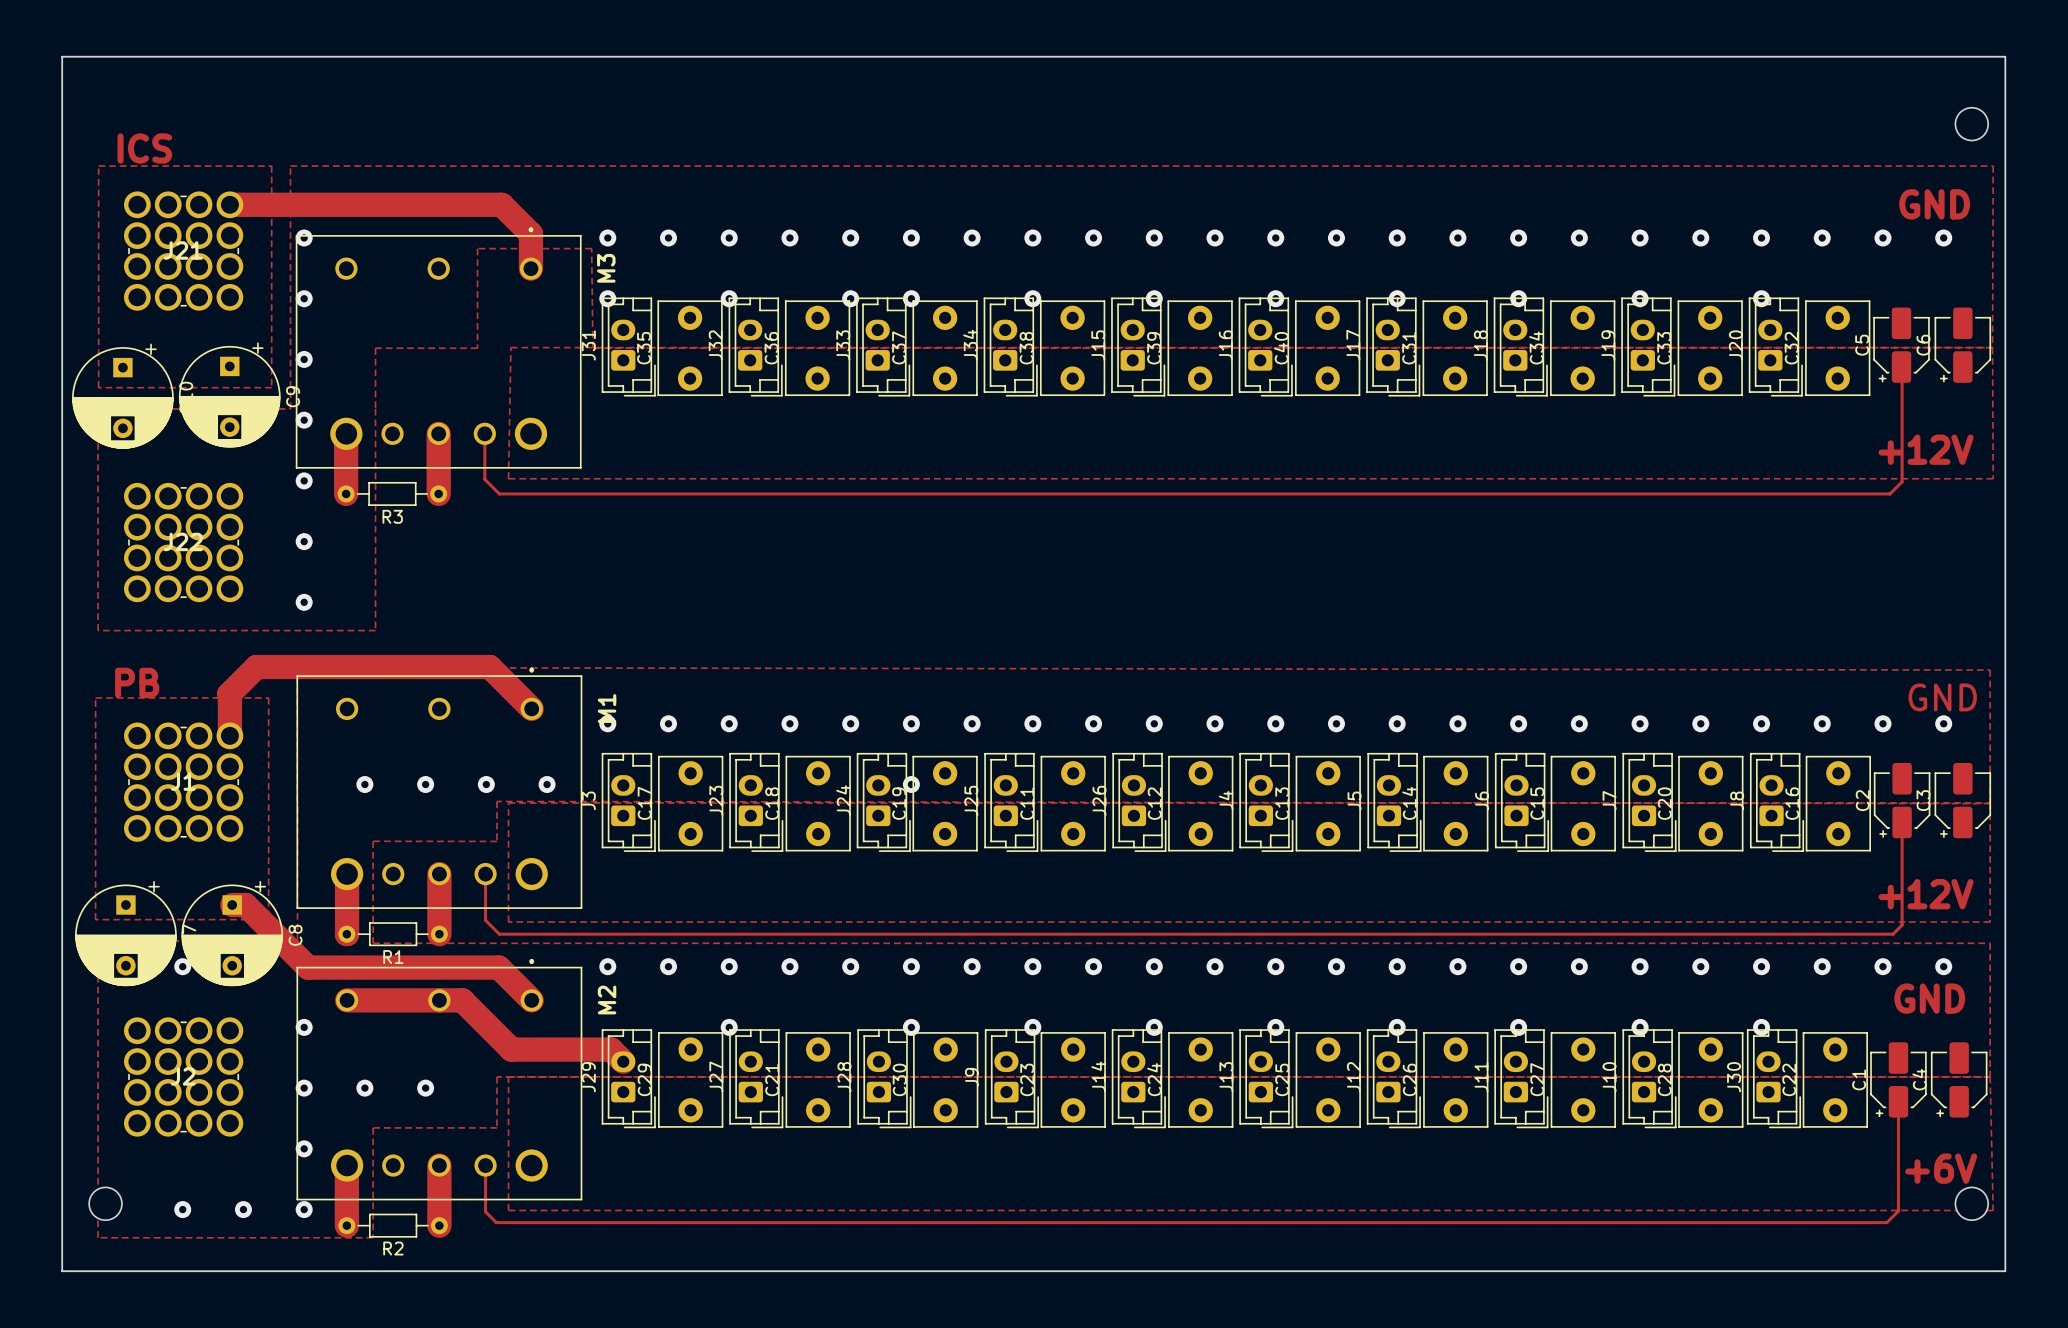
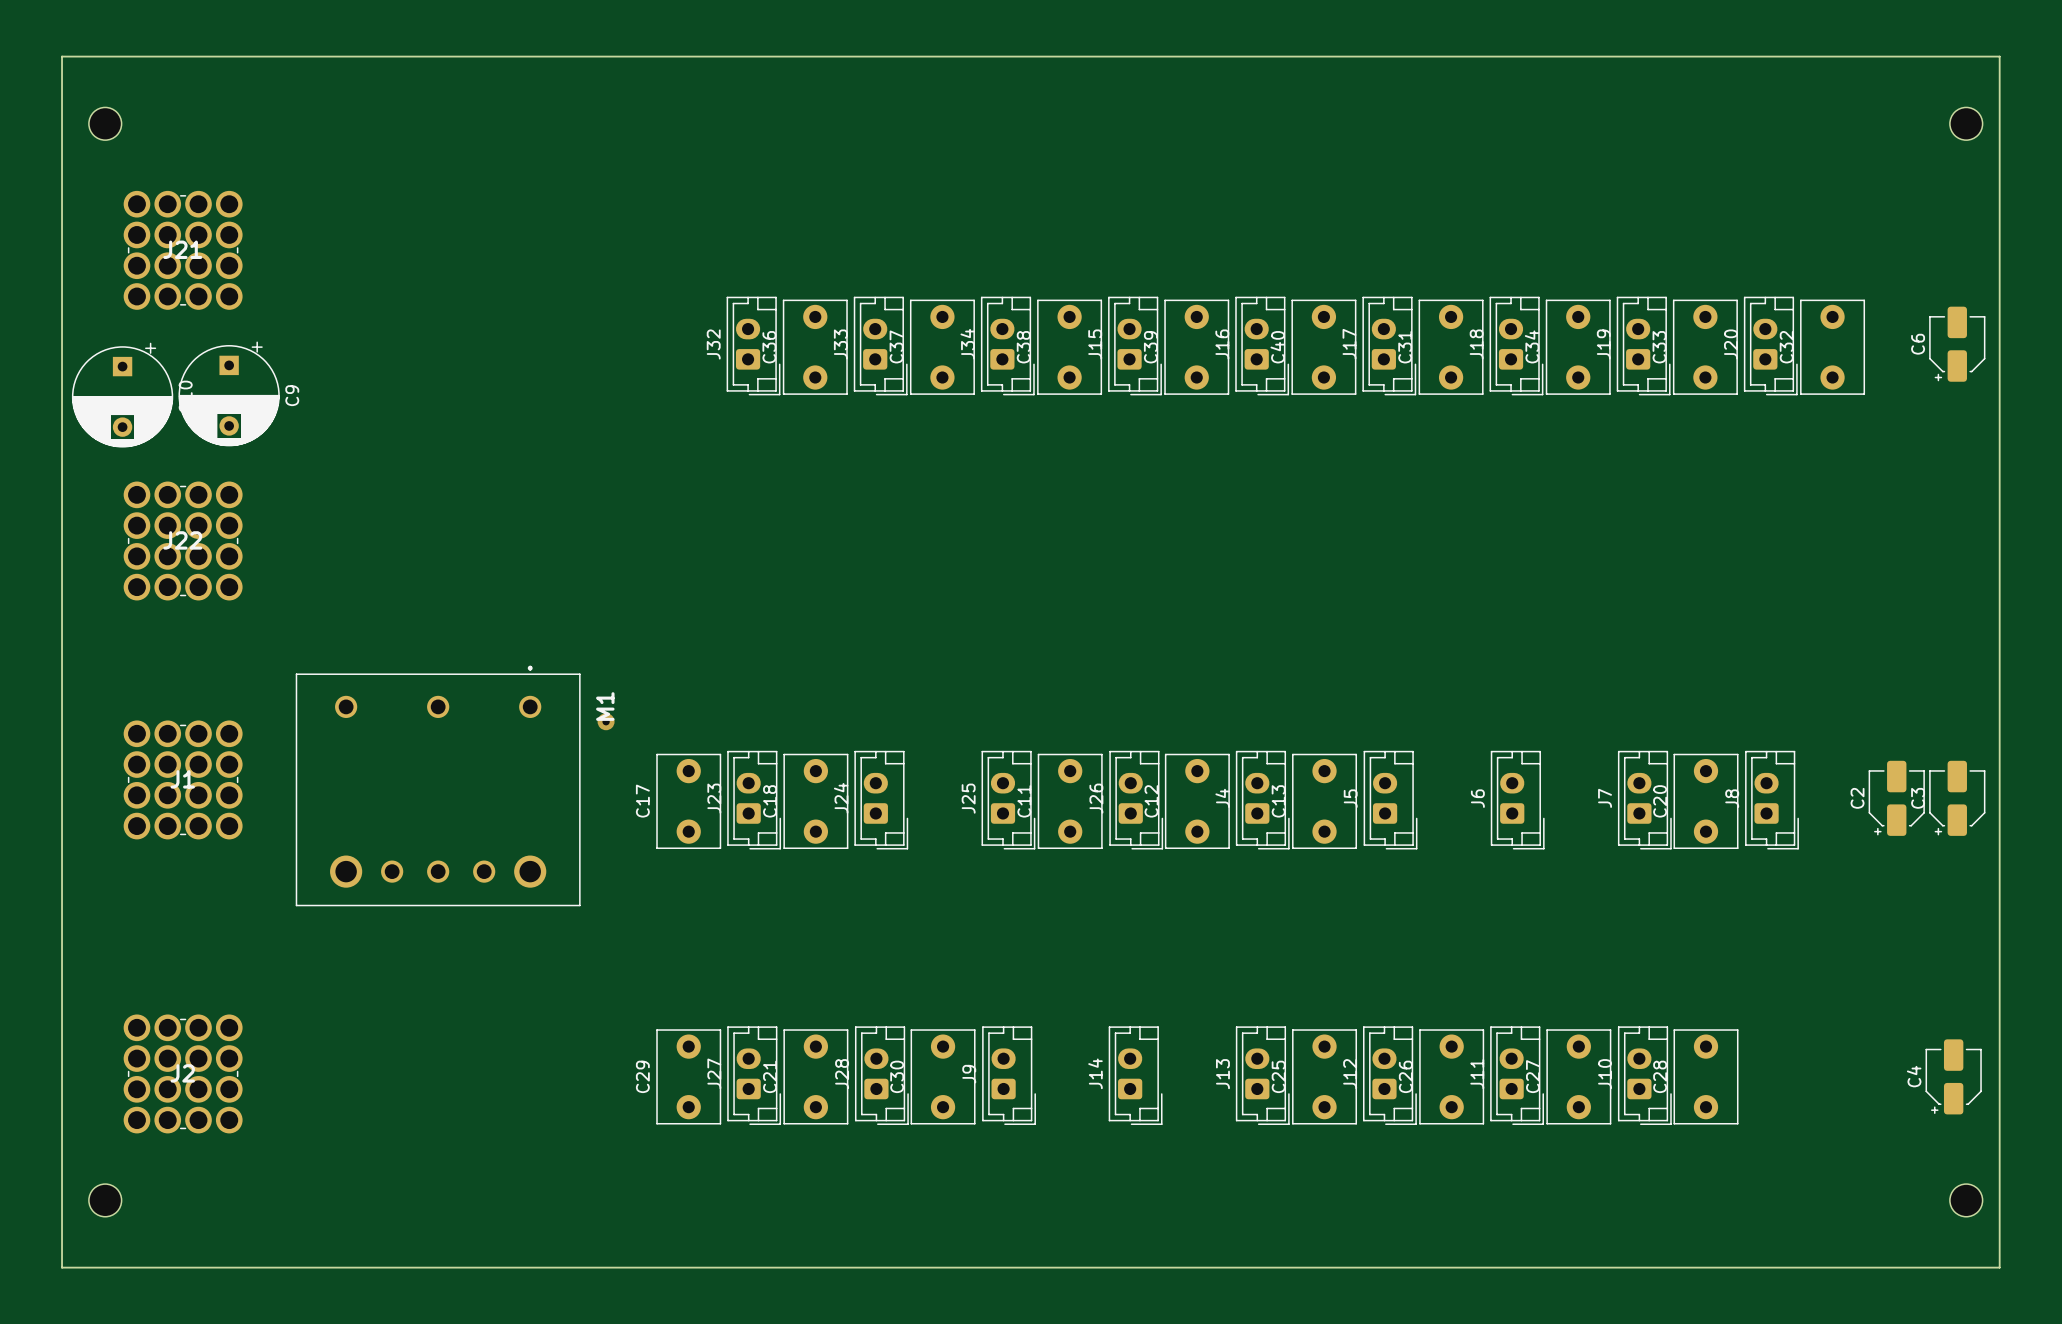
part: none -> (105, 123)
text: ICS (144, 148) -> none
zone outline: (98, 166) (271, 166) (271, 387) (98, 387) (98, 166) -> none
track: (229, 204) (501, 204) (530, 234) (530, 268) -> none
text: GND (1934, 204) -> none
via: (304, 238) -> none
via: (607, 238) -> none
via: (668, 238) -> none
via: (729, 238) -> none
via: (789, 238) -> none
via: (850, 238) -> none
via: (911, 238) -> none
via: (972, 238) -> none
via: (1032, 238) -> none
via: (1093, 238) -> none
via: (1154, 238) -> none
via: (1215, 238) -> none
via: (1275, 238) -> none
via: (1336, 238) -> none
via: (1397, 238) -> none
via: (1457, 238) -> none
via: (1518, 238) -> none
via: (1579, 238) -> none
via: (1640, 238) -> none
via: (1700, 238) -> none
via: (1761, 238) -> none
via: (1822, 238) -> none
via: (1882, 238) -> none
via: (1943, 238) -> none
via: (304, 298) -> none
via: (607, 298) -> none
via: (729, 298) -> none
via: (850, 298) -> none
via: (911, 298) -> none
via: (1032, 298) -> none
via: (1154, 298) -> none
via: (1275, 298) -> none
via: (1397, 298) -> none
via: (1518, 298) -> none
via: (1640, 298) -> none
via: (1761, 298) -> none
C5: (1901, 345) -> none
M3: (438, 347) -> none
J31: (628, 347) -> none
zone outline: (1992, 347) (592, 348) (591, 248) (477, 248) (477, 348) (375, 348) (375, 630) (98, 630) (98, 408) (290, 408) (290, 166) (1993, 166) (1992, 347) -> none
zone outline: (1992, 347) (510, 347) (508, 478) (1993, 478) (1992, 347) -> none
C35: (690, 348) -> none
via: (304, 359) -> none
track: (1901, 367) (1902, 481) (1889, 493) (499, 493) (484, 479) (484, 433) -> none
via: (304, 420) -> none
track: (346, 433) (346, 493) -> none
track: (438, 433) (438, 493) -> none
text: +12V (1926, 449) -> none
via: (304, 480) -> none
R3: (392, 493) -> none
via: (304, 541) -> none
via: (304, 602) -> none
text: PB (137, 682) -> none
zone outline: (95, 697) (95, 919) (268, 919) (268, 697) (95, 697) -> none
text: GND (1942, 697) -> none
track: (531, 708) (489, 667) (256, 667) (229, 694) (229, 735) -> none
via: (668, 723) -> none
via: (729, 723) -> none
via: (789, 723) -> none
via: (850, 723) -> none
via: (911, 723) -> none
via: (972, 723) -> none
via: (1032, 723) -> none
via: (1093, 723) -> none
via: (1154, 723) -> none
via: (1215, 723) -> none
via: (1275, 723) -> none
via: (1336, 723) -> none
via: (1397, 723) -> none
via: (1457, 723) -> none
via: (1518, 723) -> none
via: (1579, 723) -> none
via: (1640, 723) -> none
via: (1700, 723) -> none
via: (1761, 723) -> none
via: (1822, 723) -> none
via: (1882, 723) -> none
via: (1943, 723) -> none
via: (364, 784) -> none
via: (425, 784) -> none
via: (486, 784) -> none
via: (547, 784) -> none
via: (911, 784) -> none
J3: (628, 802) -> none
C19: (945, 803) -> none
C14: (1455, 803) -> none
C15: (1583, 803) -> none
C16: (1838, 803) -> none
zone outline: (1990, 803) (508, 803) (508, 922) (1990, 922) (1990, 670) (297, 667) (297, 940) (98, 940) (98, 1237) (373, 1237) (373, 1127) (496, 1127) (496, 1076) (1990, 1076) -> none
zone outline: (1990, 803) (496, 801) (496, 841) (373, 841) (373, 943) (1990, 943) (1990, 1076) -> none
track: (1902, 822) (1902, 925) (1892, 934) (499, 934) (485, 920) (485, 874) -> none
track: (347, 874) (346, 934) -> none
track: (439, 874) (439, 934) -> none
text: +12V (1926, 894) -> none
track: (232, 905) (245, 905) (308, 967) (498, 967) (531, 1000) -> none
part: (125, 933) -> none
C8: (232, 933) -> none
R1: (393, 934) -> none
via: (182, 966) -> none
via: (607, 966) -> none
via: (668, 966) -> none
via: (729, 966) -> none
via: (789, 966) -> none
via: (850, 966) -> none
via: (911, 966) -> none
via: (972, 966) -> none
via: (1032, 966) -> none
via: (1093, 966) -> none
via: (1154, 966) -> none
via: (1215, 966) -> none
via: (1275, 966) -> none
via: (1336, 966) -> none
via: (1397, 966) -> none
via: (1457, 966) -> none
via: (1518, 966) -> none
via: (1579, 966) -> none
via: (1640, 966) -> none
via: (1700, 966) -> none
via: (1761, 966) -> none
via: (1822, 966) -> none
via: (1882, 966) -> none
via: (1943, 966) -> none
text: GND (1929, 998) -> none
track: (347, 1000) (462, 1000) (511, 1049) (611, 1049) (623, 1061) -> none
via: (304, 1027) -> none
via: (729, 1027) -> none
via: (911, 1027) -> none
via: (1032, 1027) -> none
via: (1154, 1027) -> none
via: (1275, 1027) -> none
via: (1397, 1027) -> none
via: (1518, 1027) -> none
via: (1640, 1027) -> none
via: (1761, 1027) -> none
zone outline: (508, 1076) (508, 1210) (1993, 1210) (1990, 1076) -> none
J29: (628, 1078) -> none
J30: (1773, 1078) -> none
M2: (439, 1079) -> none
C23: (1073, 1079) -> none
C24: (1200, 1079) -> none
C22: (1835, 1079) -> none
C1: (1898, 1079) -> none
via: (304, 1088) -> none
via: (364, 1088) -> none
via: (425, 1088) -> none
track: (1898, 1101) (1898, 1211) (1886, 1222) (496, 1222) (485, 1211) (485, 1165) -> none
via: (304, 1148) -> none
track: (347, 1165) (346, 1225) -> none
track: (439, 1165) (439, 1225) -> none
text: +6V (1941, 1168) -> none
via: (182, 1209) -> none
via: (243, 1209) -> none
via: (304, 1209) -> none
R2: (393, 1225) -> none

